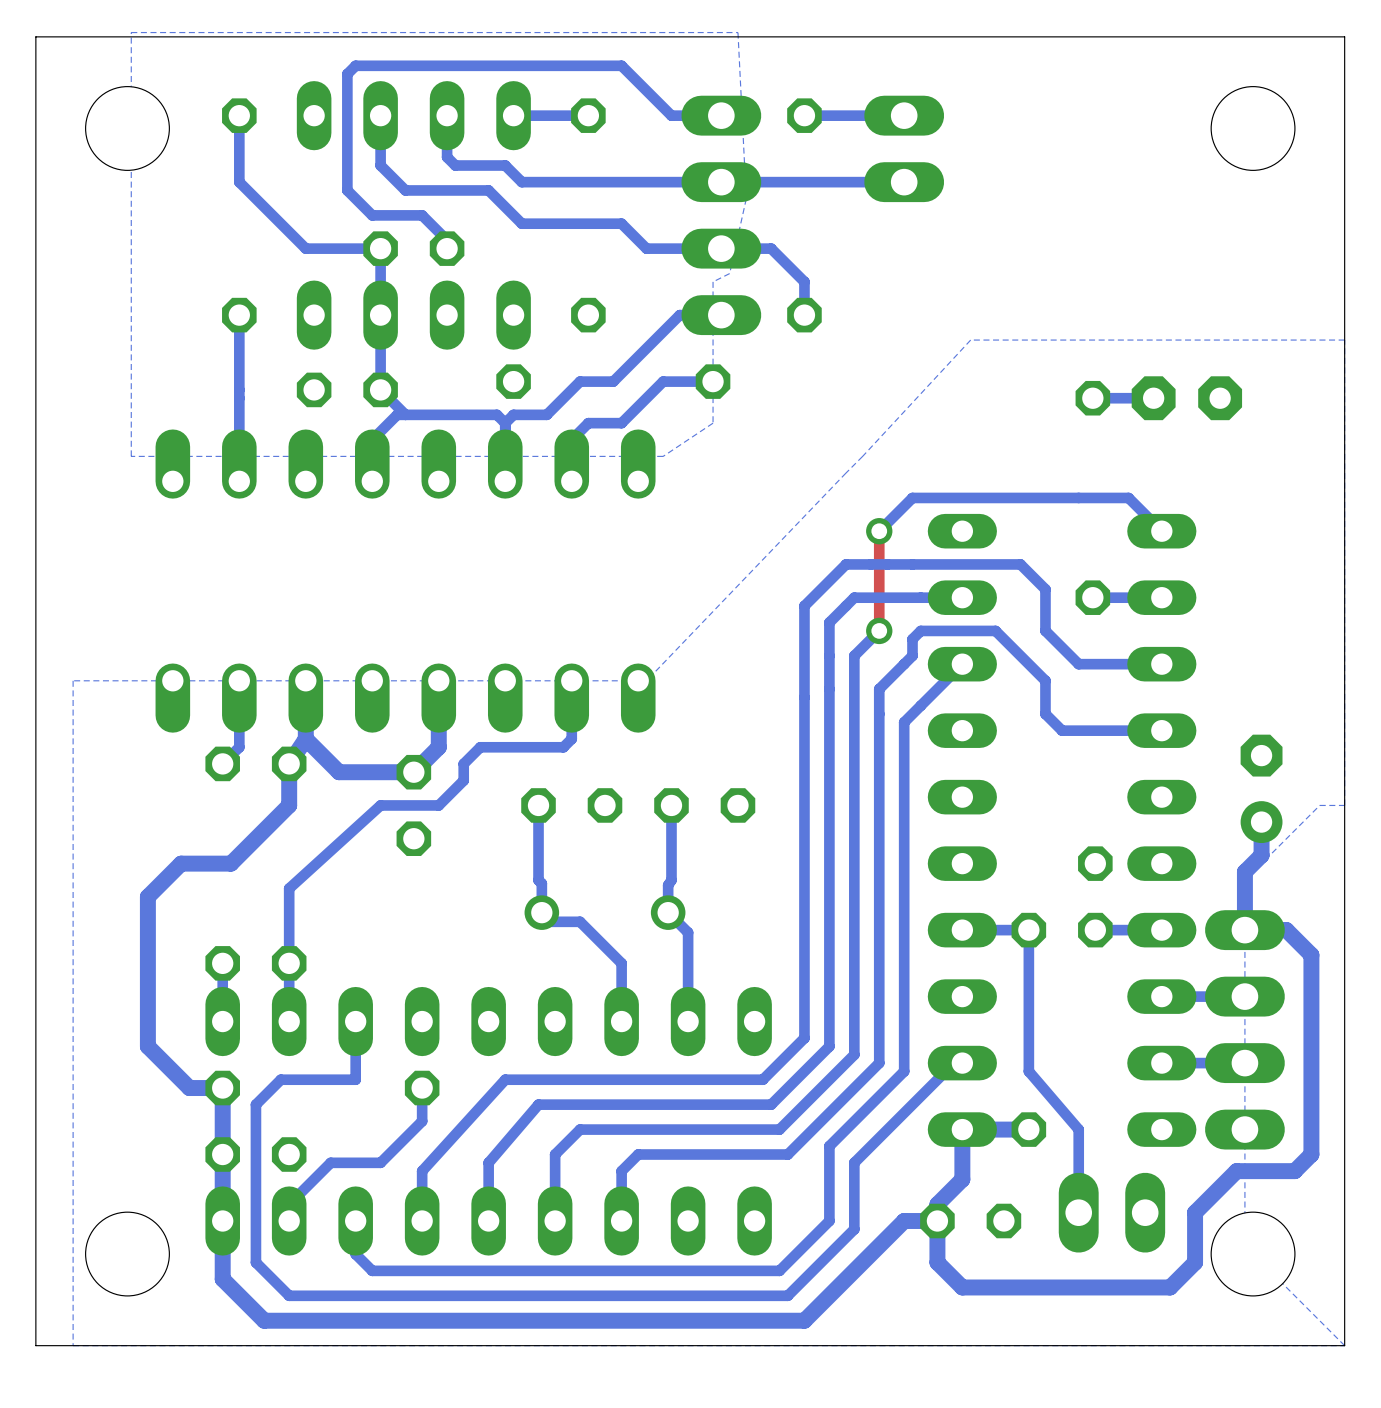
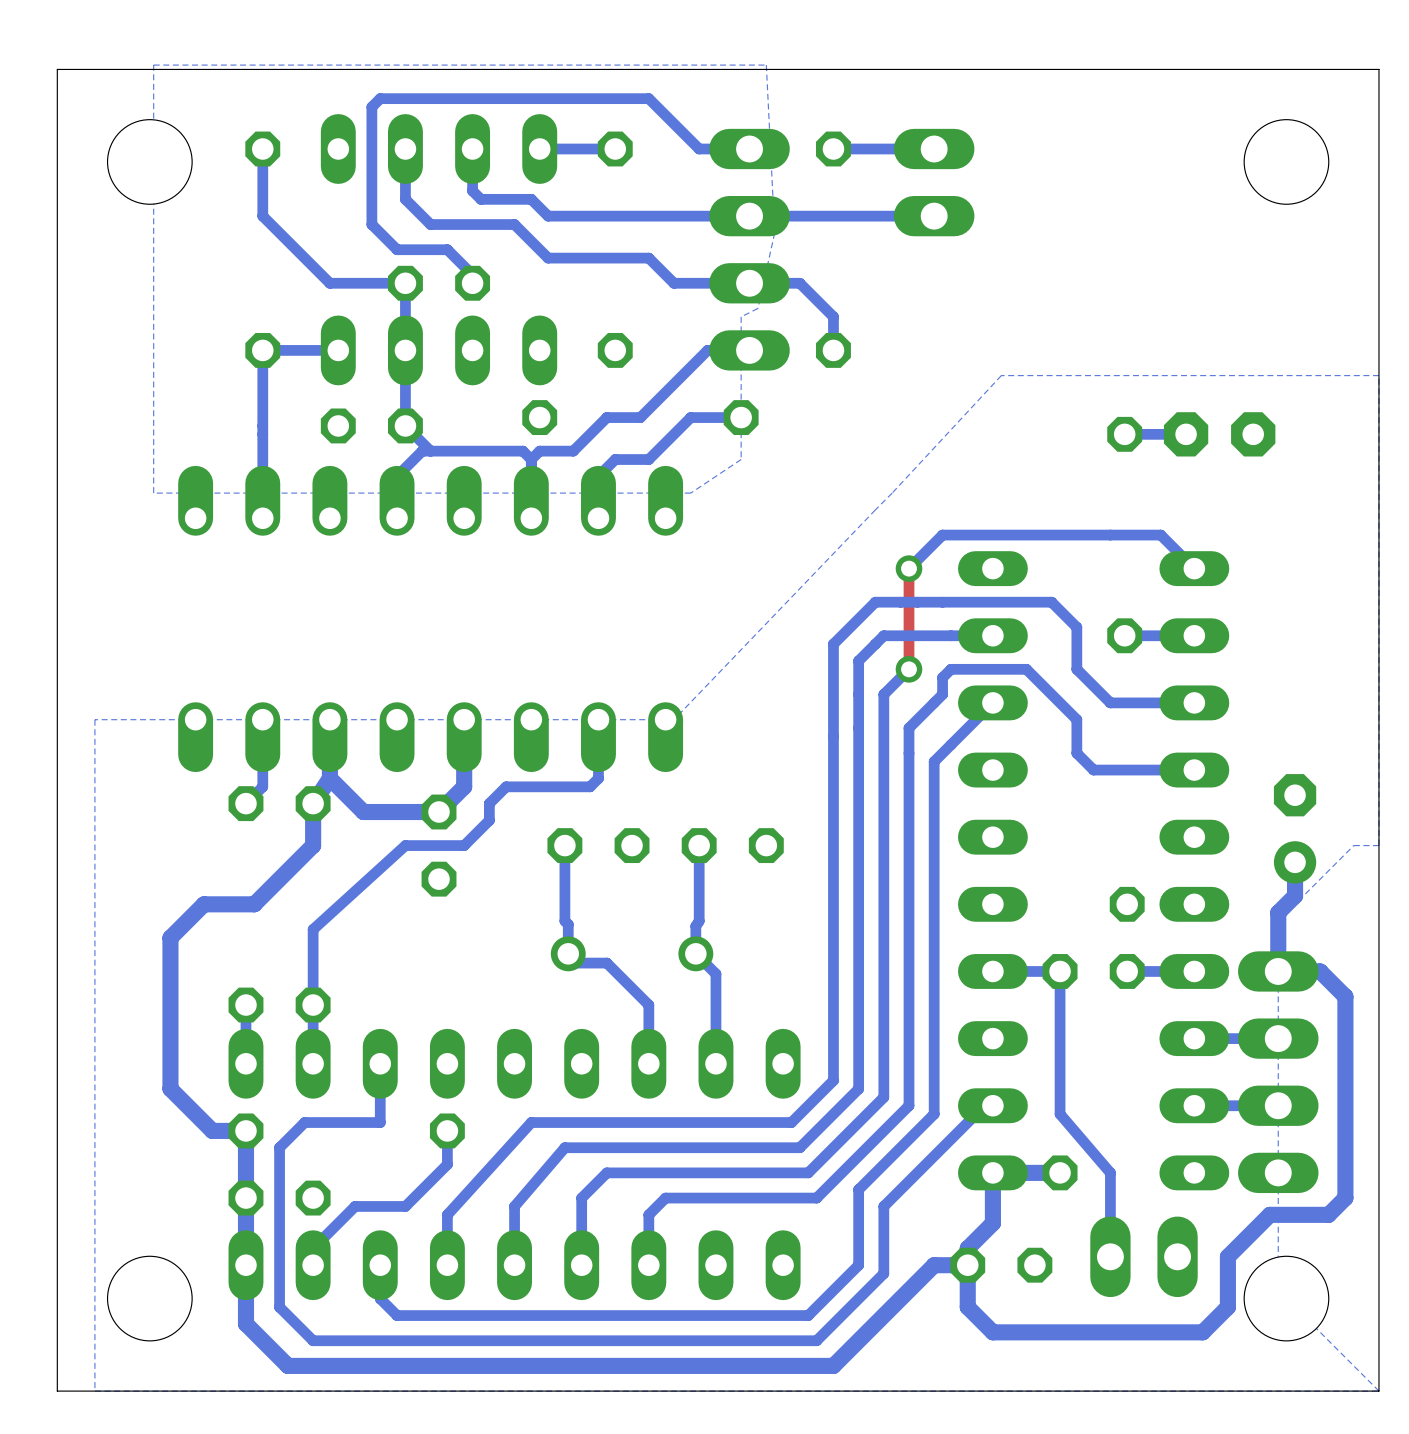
bottom track: none -> (338, 350) (262, 350)

